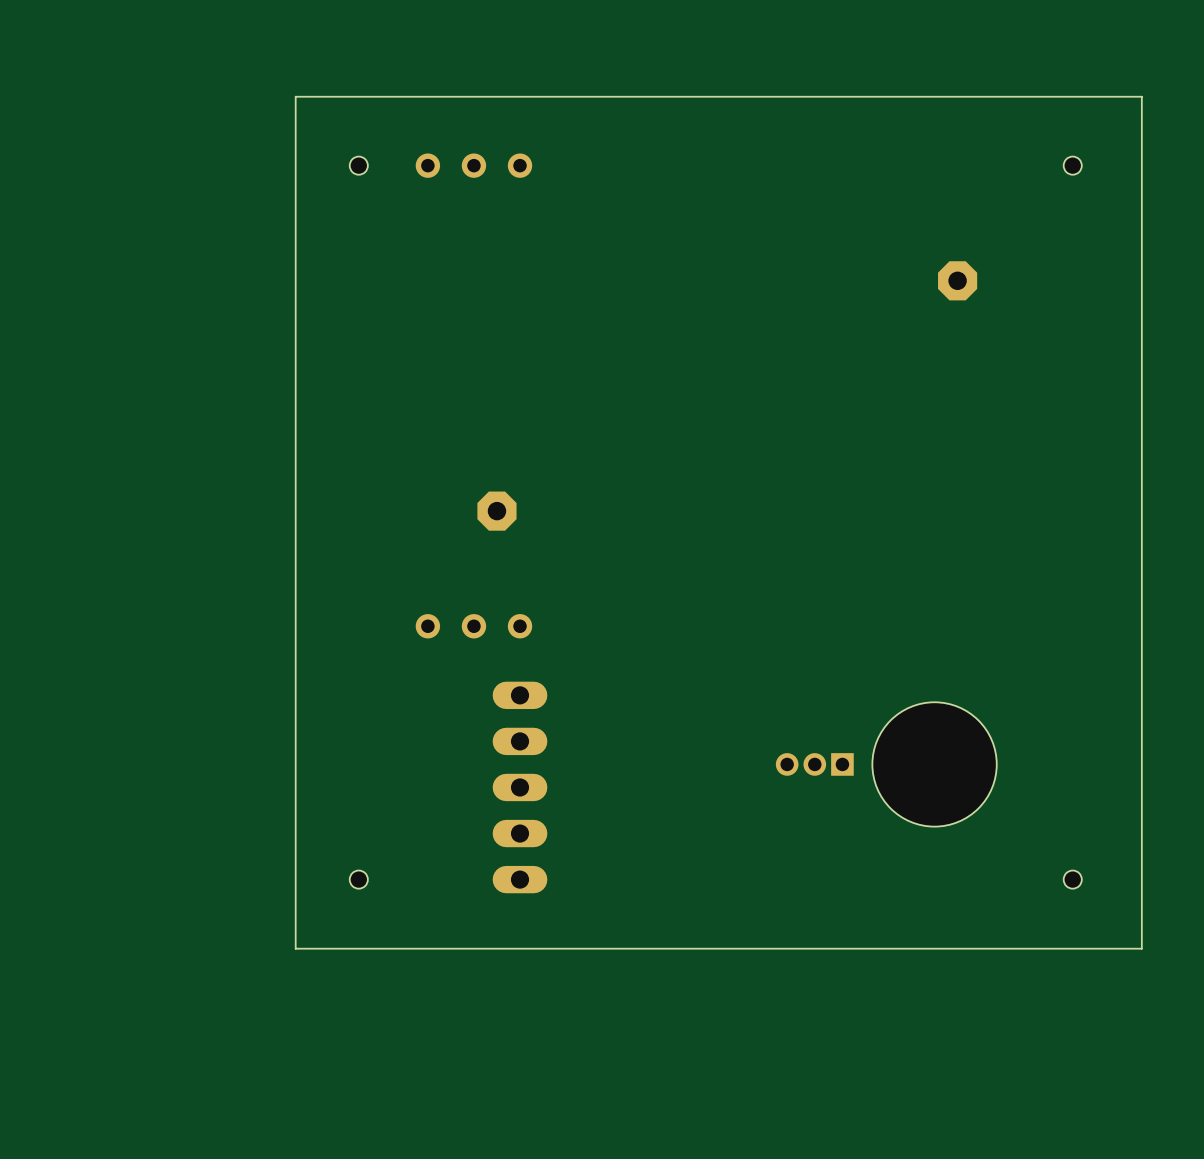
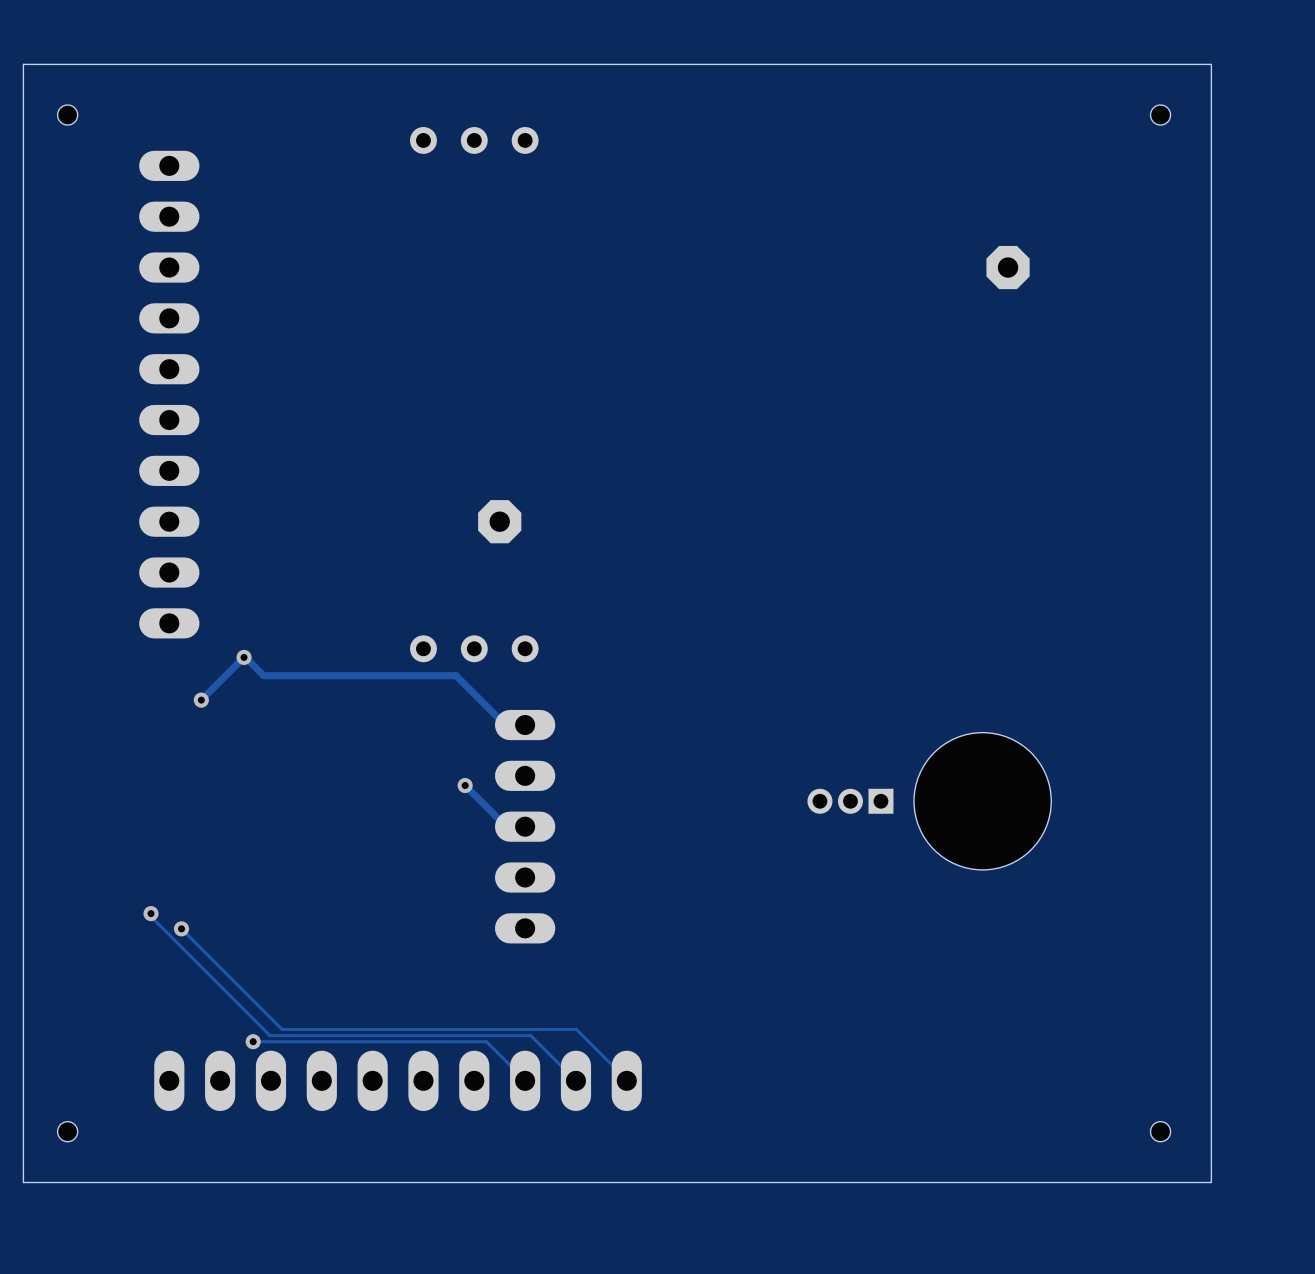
board edge: (295, 96) (295, 948) (1141, 948) -> (277, 64) (23, 64) (23, 1182) (1211, 1182) (1211, 1004)
hole position: (358, 165) -> (67, 115)
hole position: (1072, 165) -> (1160, 115)
part: none -> (169, 394)
via: none -> (244, 657)
track: none -> (201, 700) (244, 657) (263, 675) (456, 675) (504, 724) (525, 725)
via: none -> (201, 700)
track: none -> (465, 785) (506, 826) (525, 826)
via: none -> (465, 785)
track: none -> (151, 913) (151, 916) (269, 1035) (530, 1035) (575, 1080)
via: none -> (151, 913)
hole position: (358, 879) -> (67, 1131)
hole position: (1072, 879) -> (1160, 1131)
track: none -> (181, 928) (282, 1029) (576, 1029) (626, 1080)
via: none -> (181, 928)
track: none -> (253, 1041) (486, 1041) (525, 1080)
via: none -> (253, 1041)
part: none -> (398, 1080)

